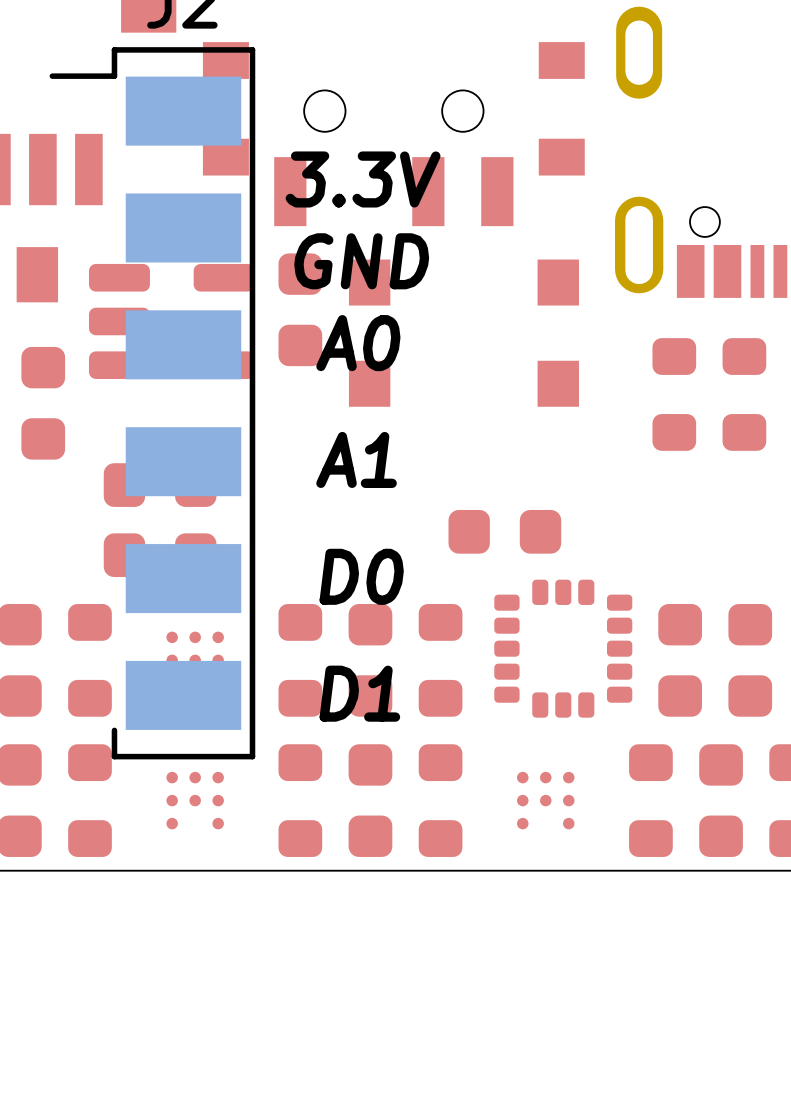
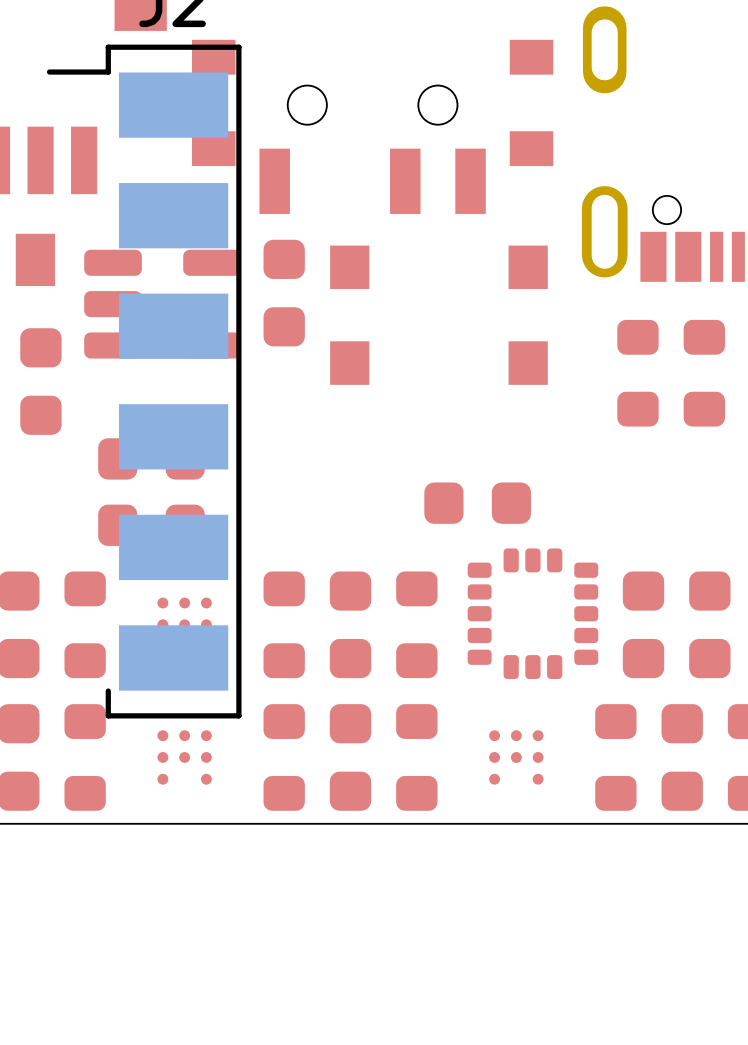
text: 3.3V (363, 179) -> none
text: GND (361, 261) -> none
text: A0 (358, 343) -> none
text: A1 (356, 459) -> none
text: D0 (361, 576) -> none
text: D1 (359, 693) -> none

